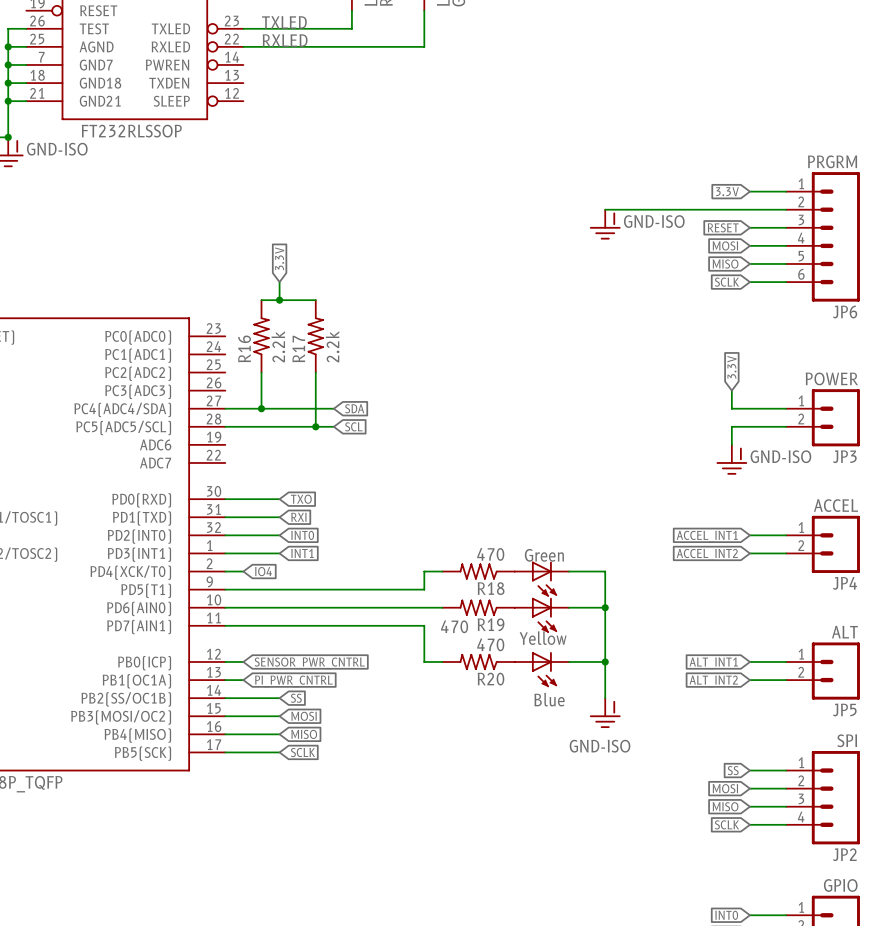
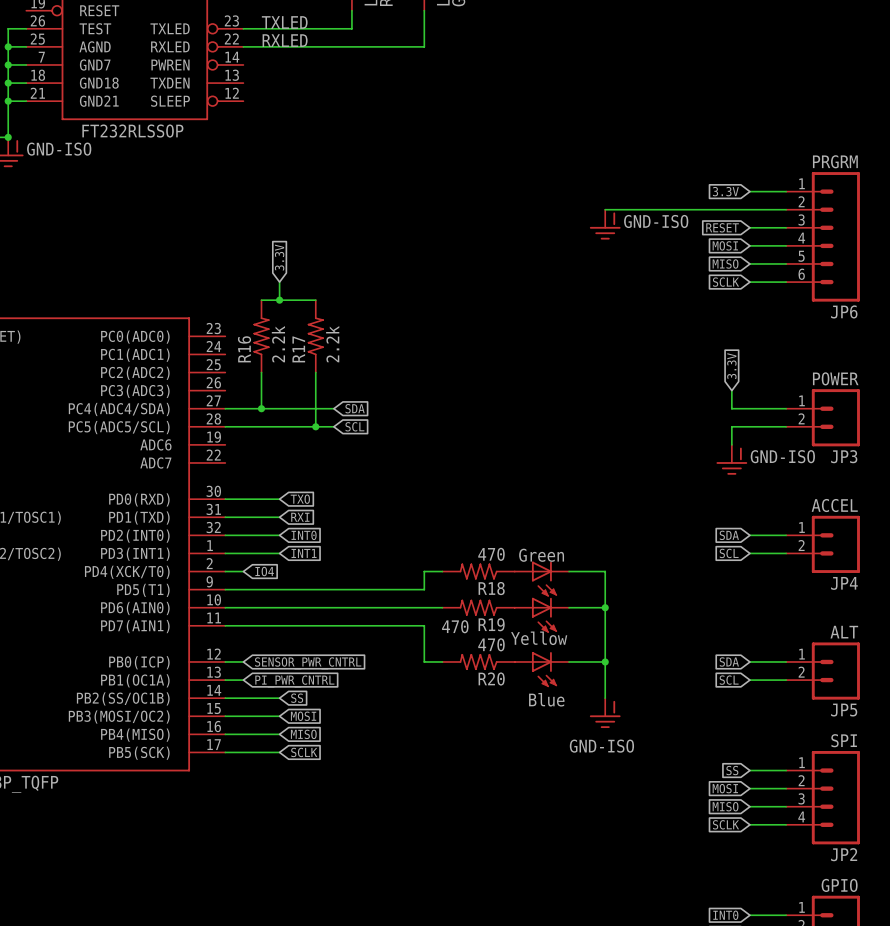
global label: ACCEL_INT1 (707, 536) -> SDA (729, 535)
global label: ACCEL_INT2 (707, 554) -> SCL (729, 553)
global label: ALT_INT1 (713, 663) -> SDA (729, 661)
global label: ALT_INT2 (713, 681) -> SCL (729, 680)

